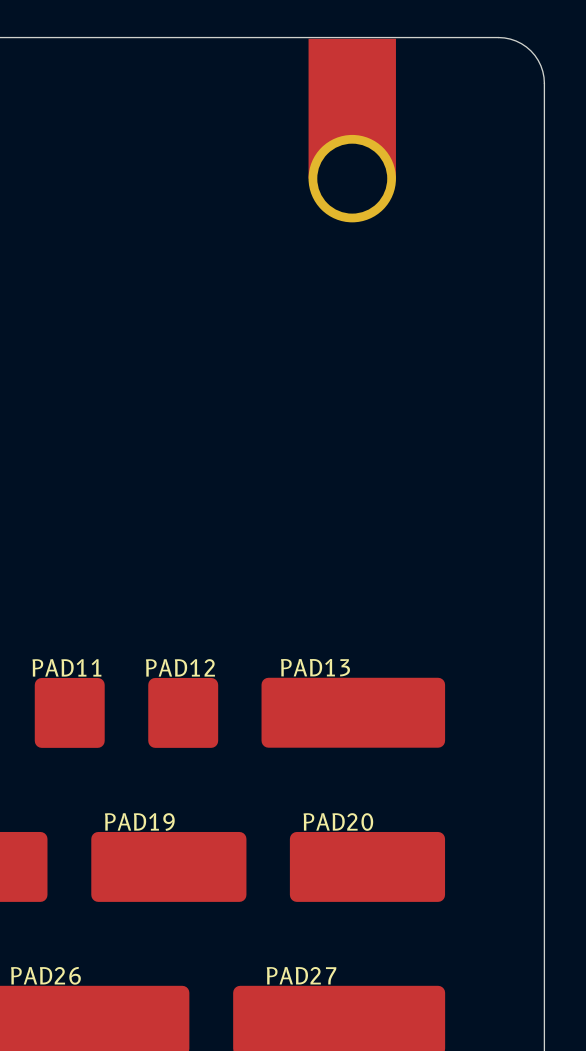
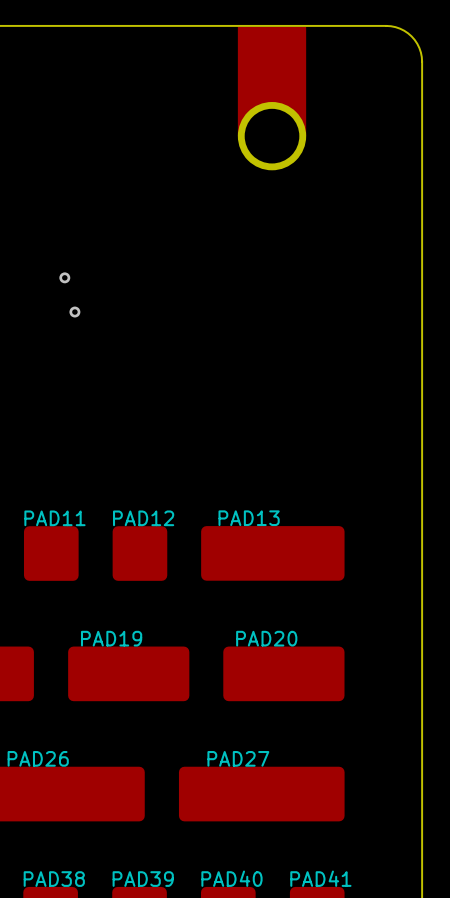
via: none -> (64, 277)
via: none -> (74, 312)

